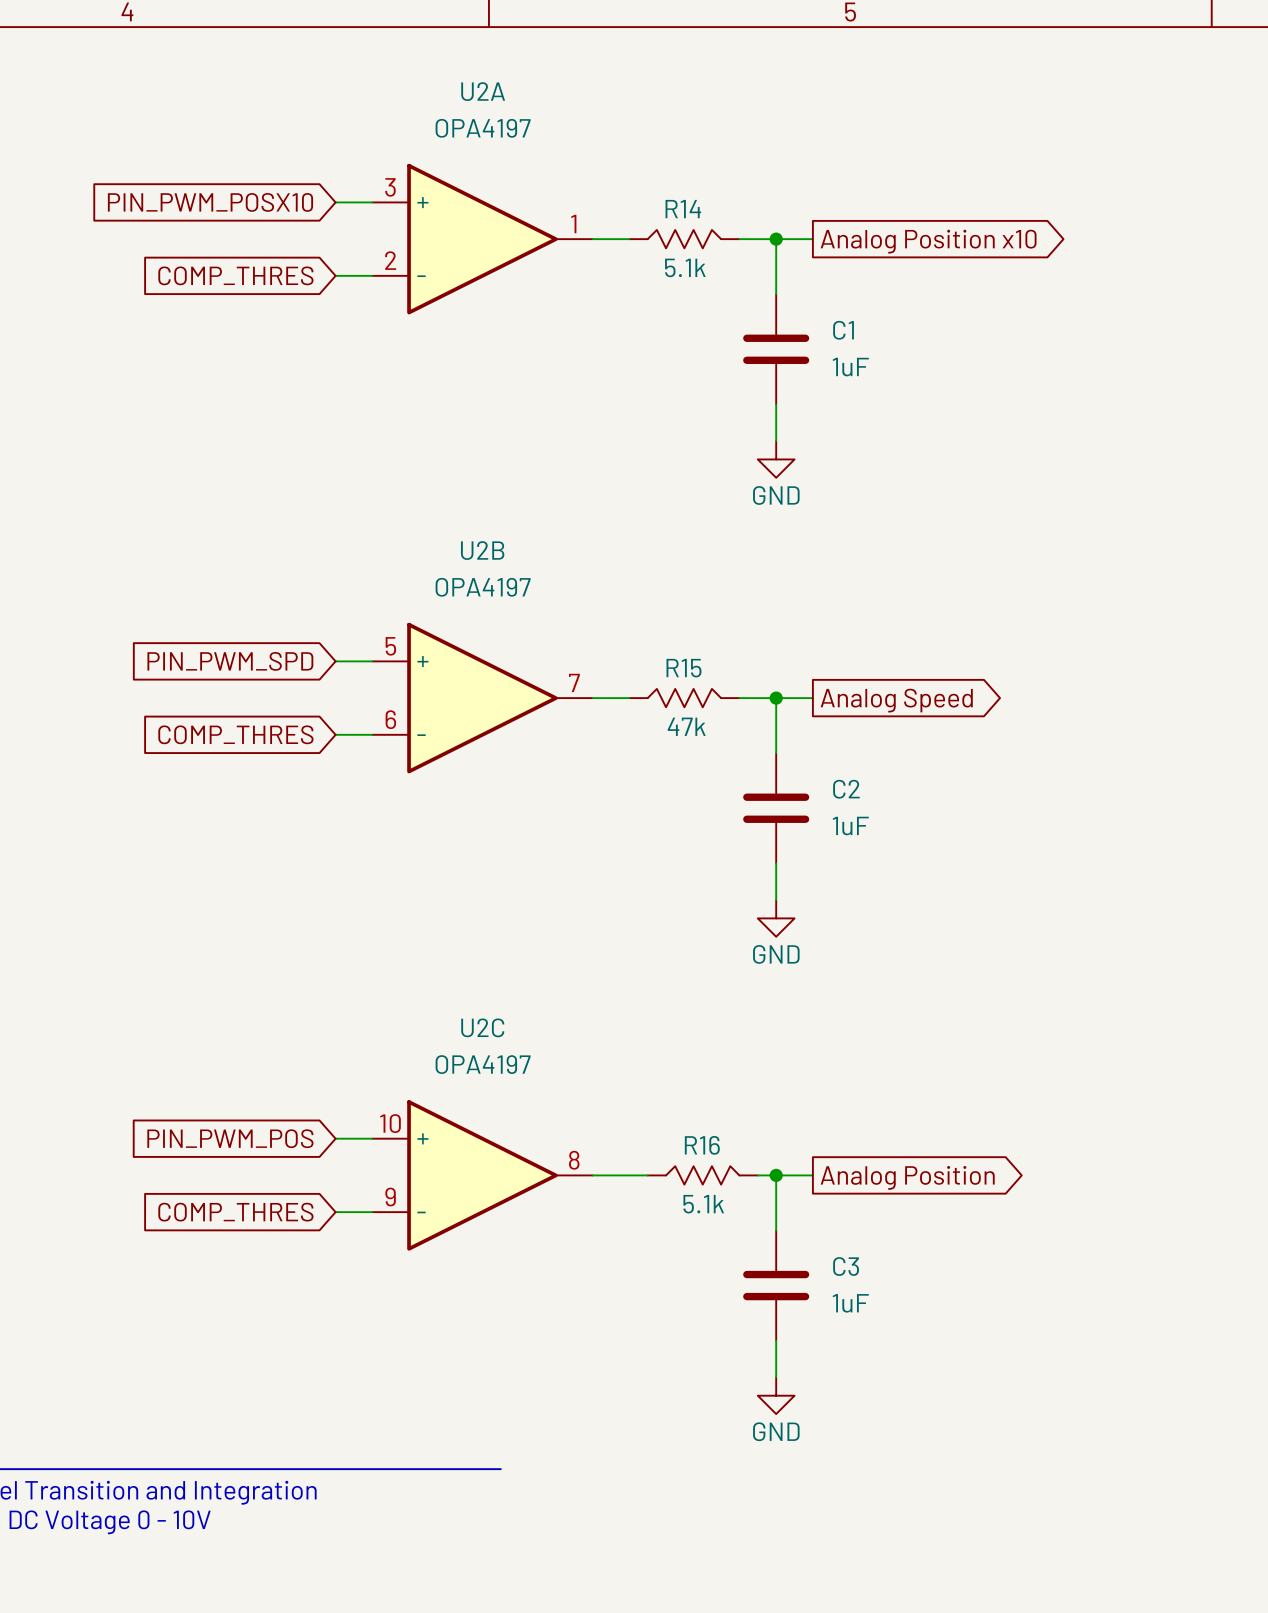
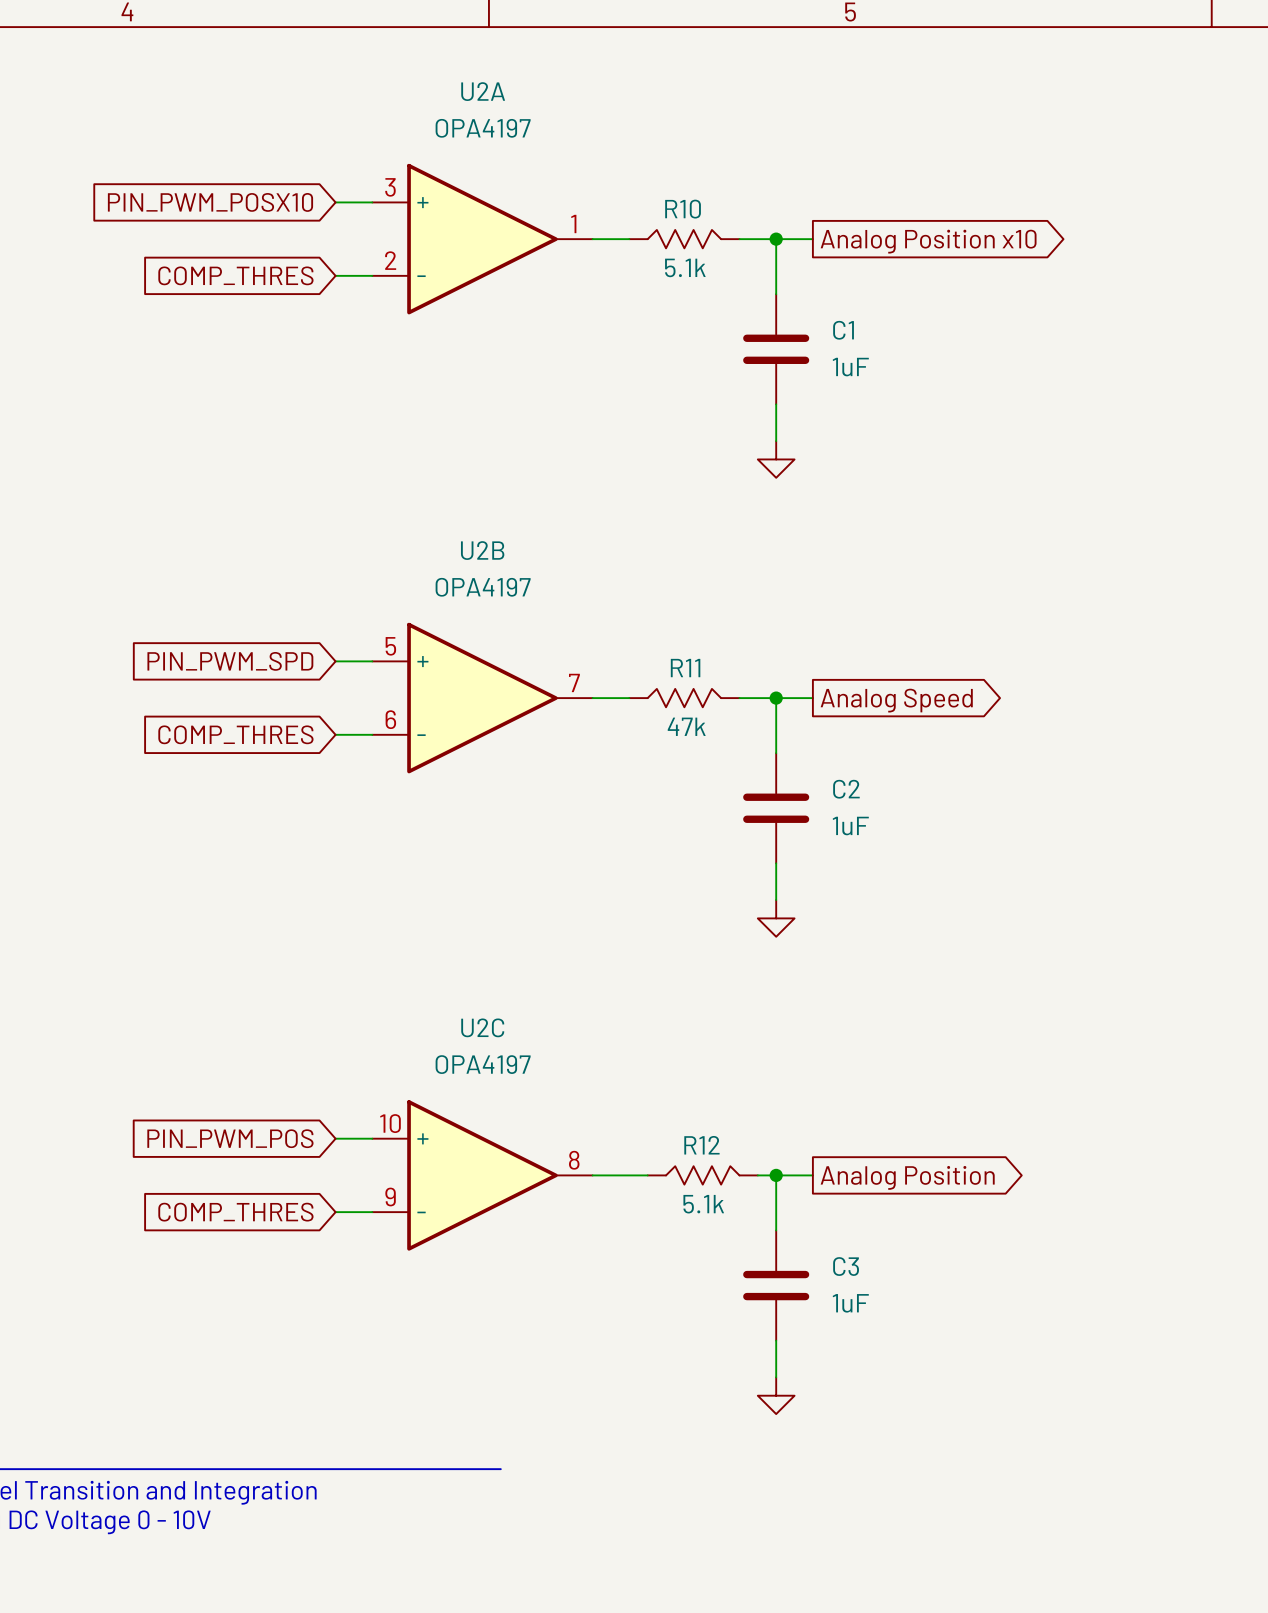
R14 name: R14 (683, 209) -> R10 (683, 209)
power symbol text: GND (776, 495) -> none
R15 name: R15 (683, 668) -> R11 (685, 668)
power symbol text: GND (776, 954) -> none
R16 name: R16 (702, 1145) -> R12 (701, 1145)
power symbol text: GND (776, 1431) -> none

